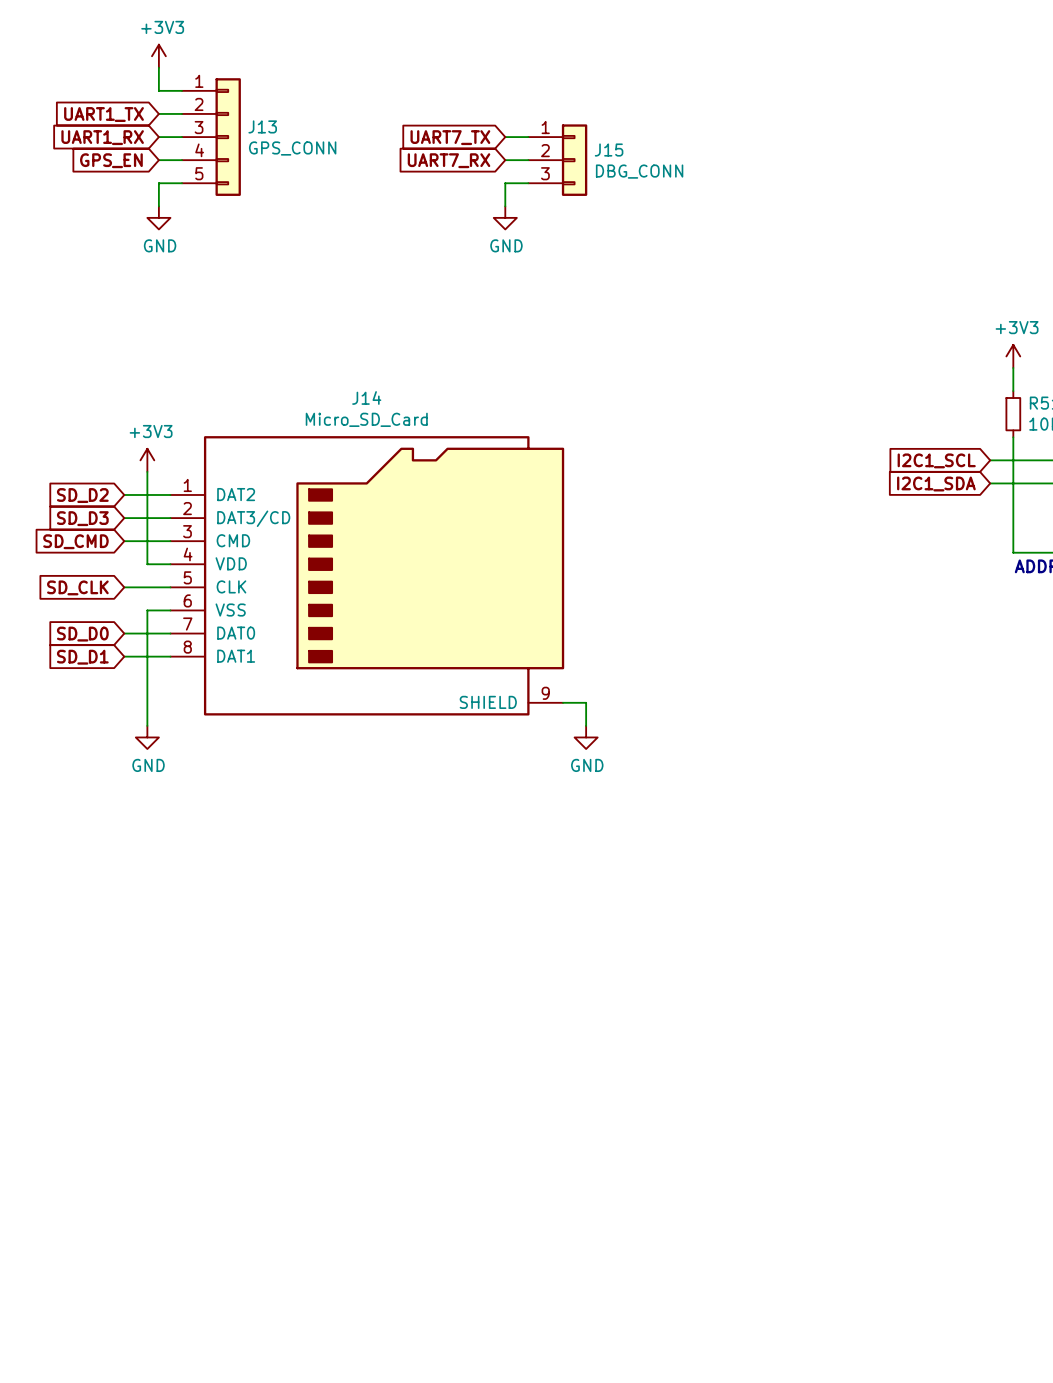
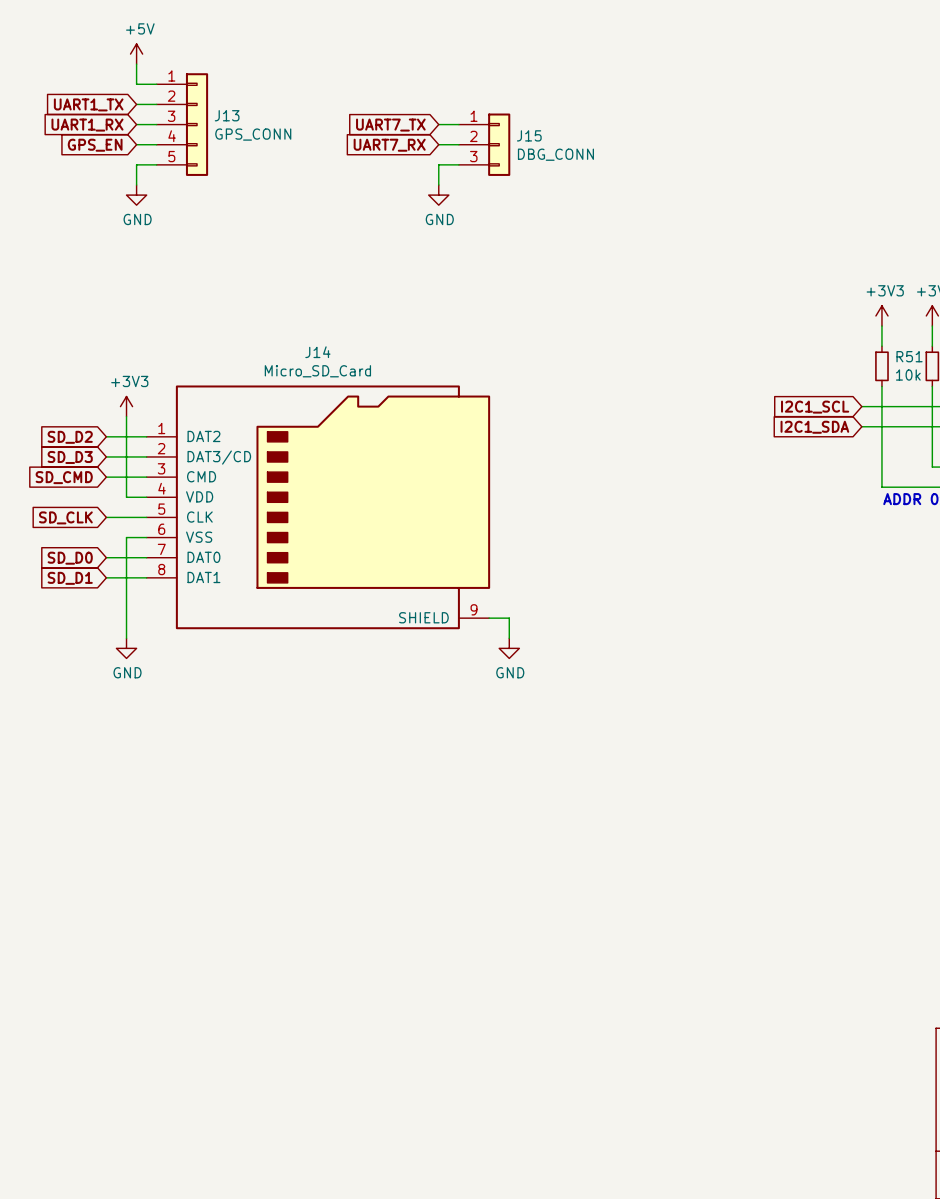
power symbol: +3V3 (158, 56) -> +5V (136, 54)

